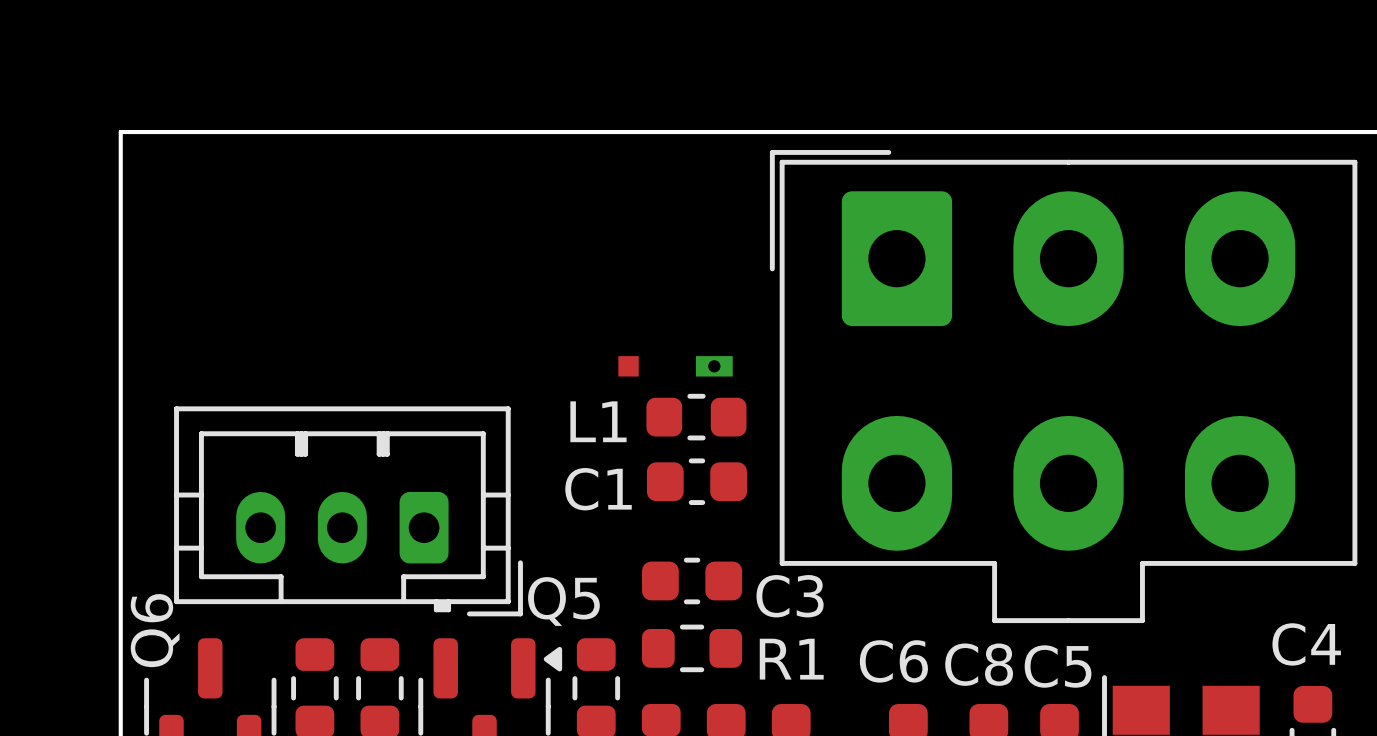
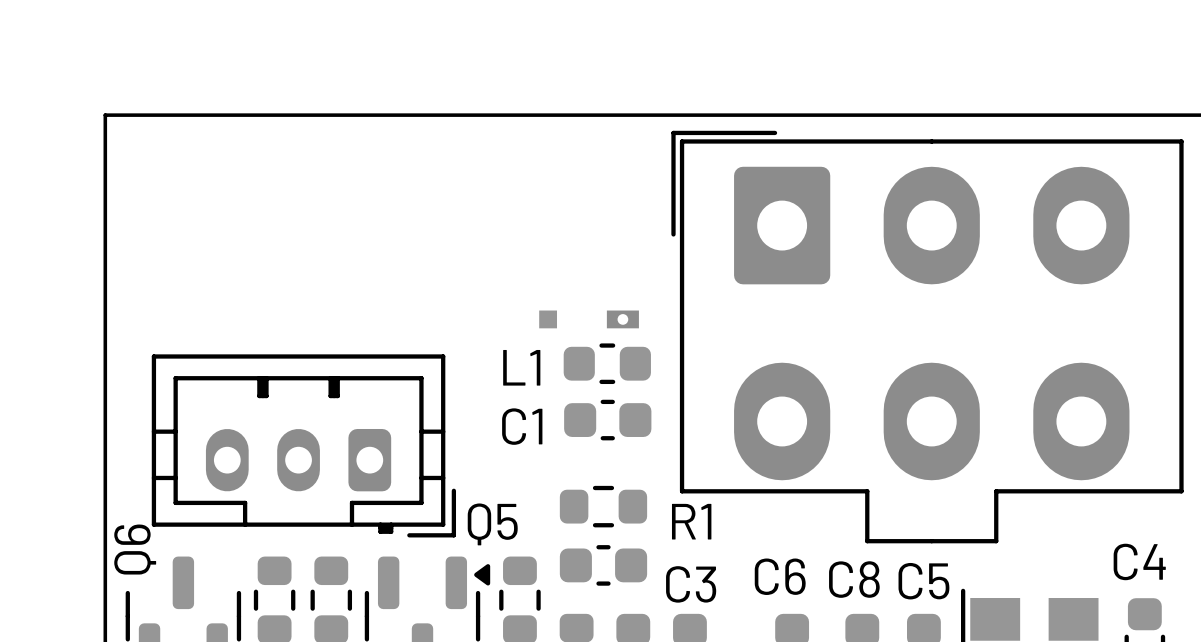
C3 position: (692, 580) -> (603, 565)
C3 name position: C3 (790, 596) -> C3 (691, 584)
R1 position: (692, 648) -> (603, 506)
R1 name position: R1 (791, 659) -> R1 (691, 521)

